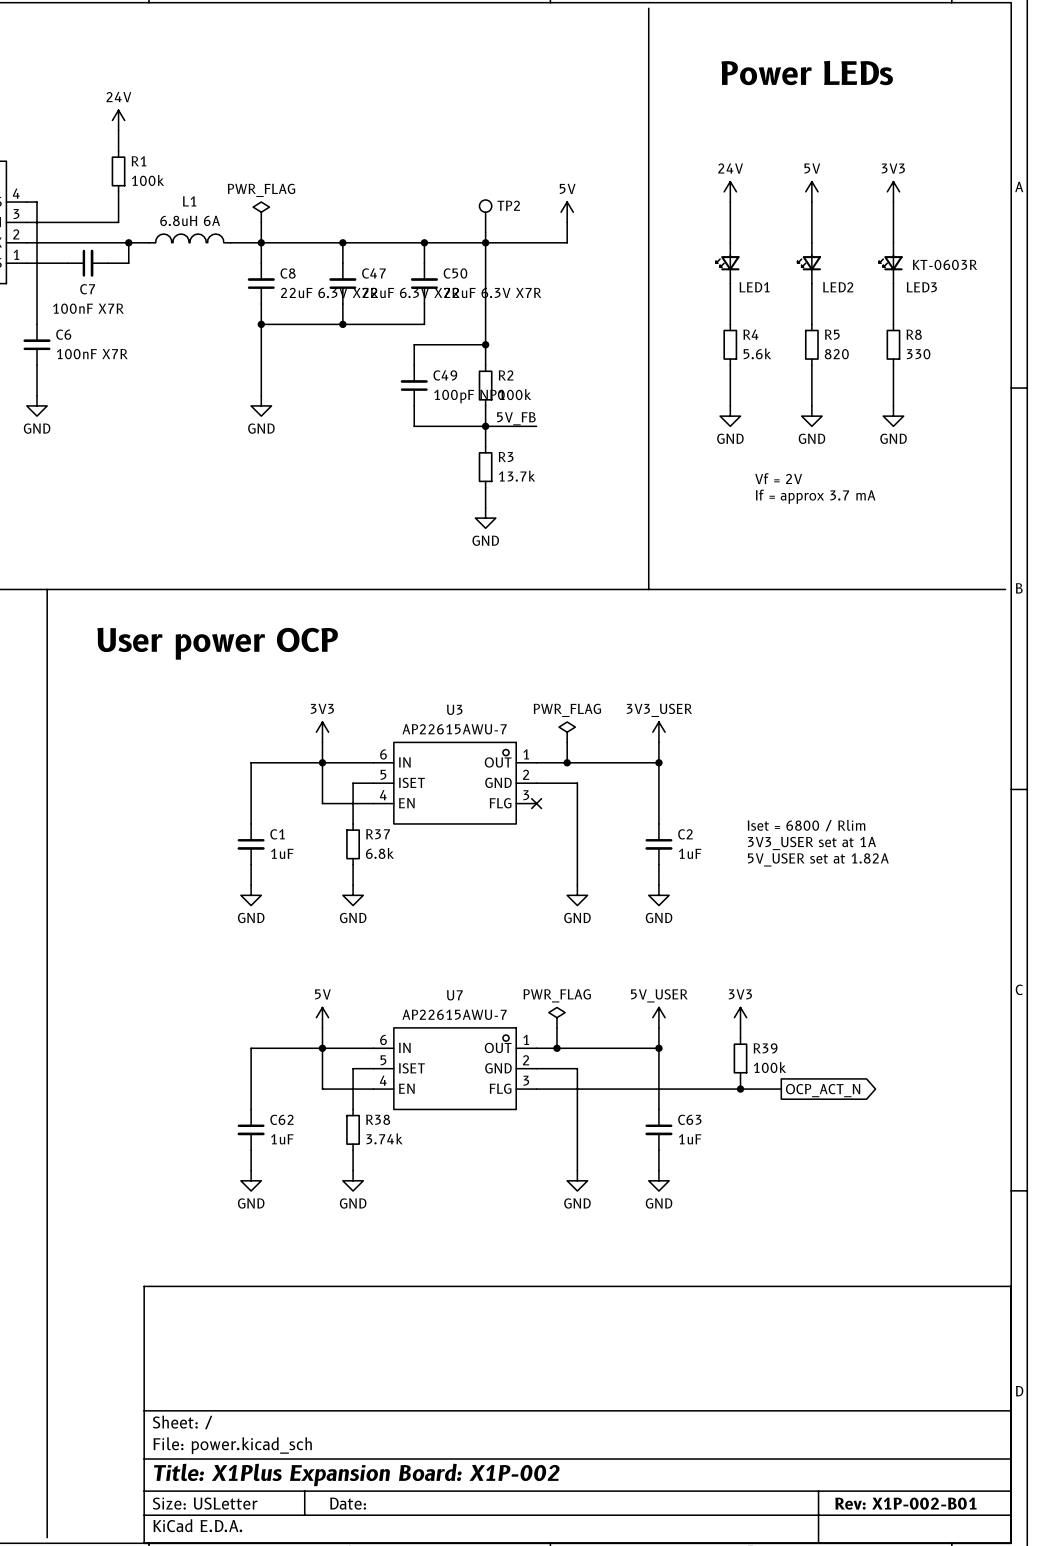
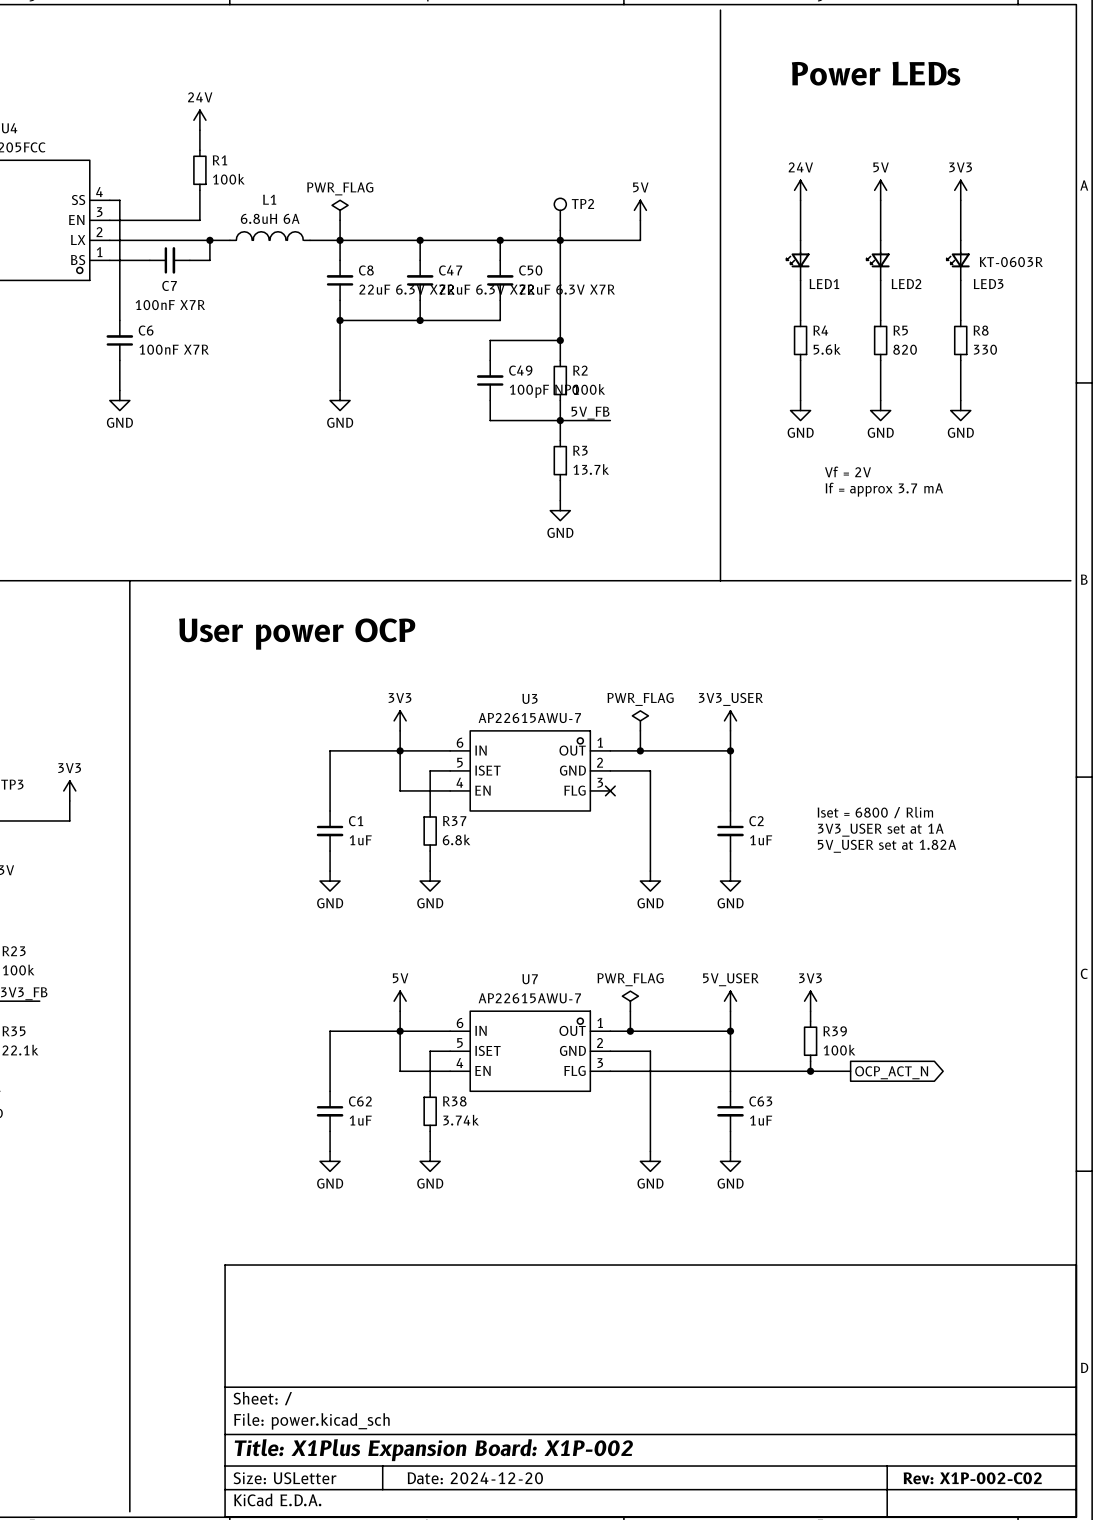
title block: Date: (348, 1503) -> Date: 2024-12-20 (475, 1478)
title block: Rev: X1P-002-B01 (905, 1503) -> Rev: X1P-002-C02 (972, 1478)

